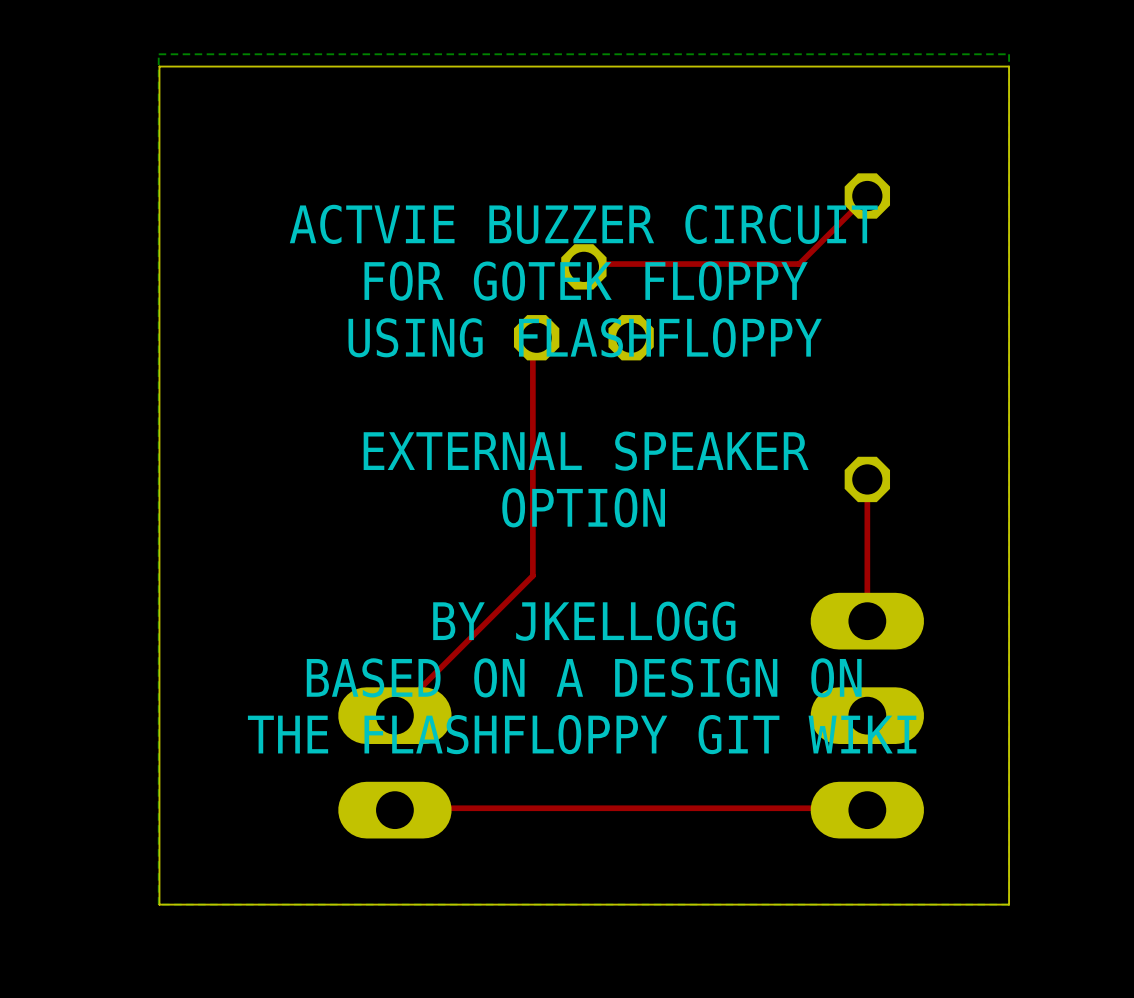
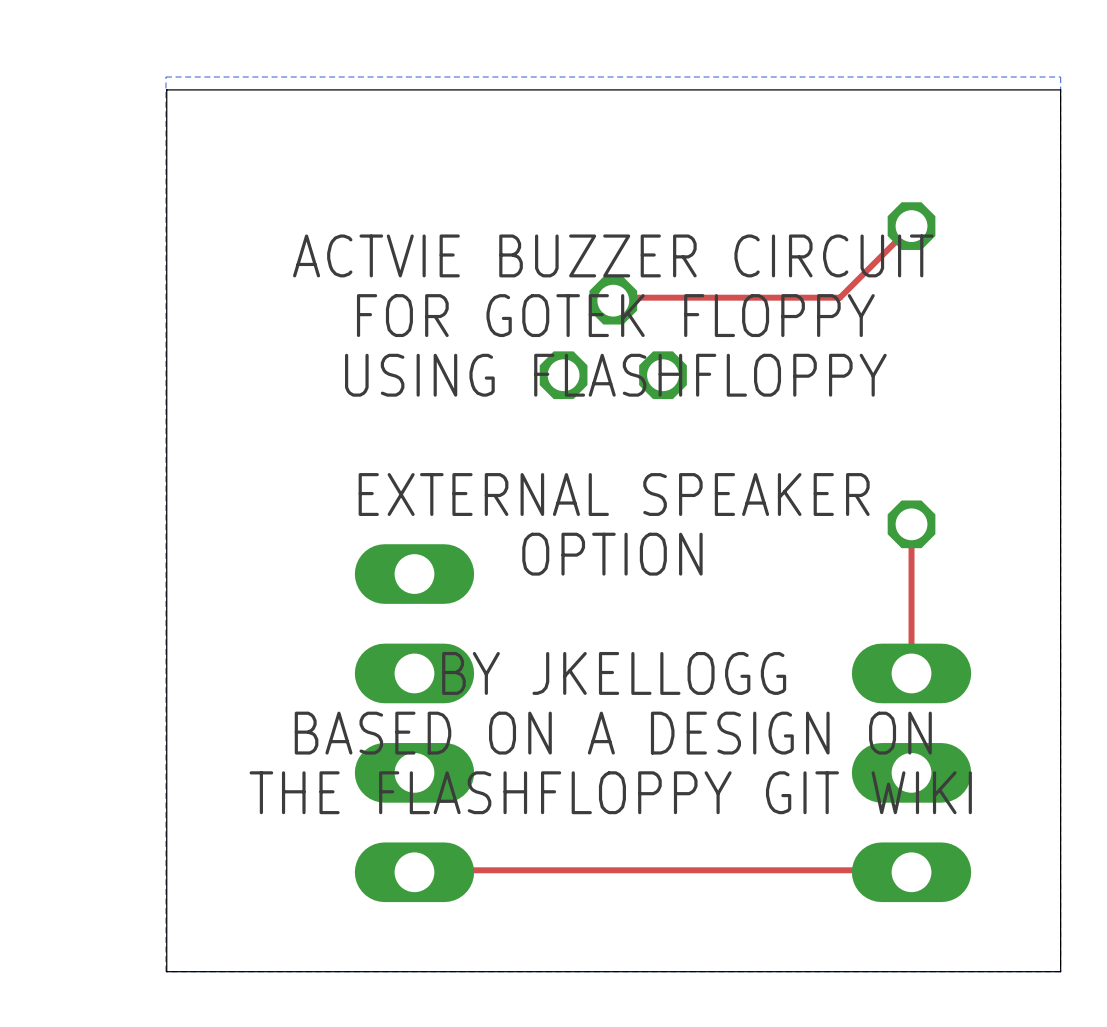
top track: (536, 337) (532, 337) (532, 575) (394, 715) -> none
part: none -> (414, 723)
part: (394, 762) -> none

